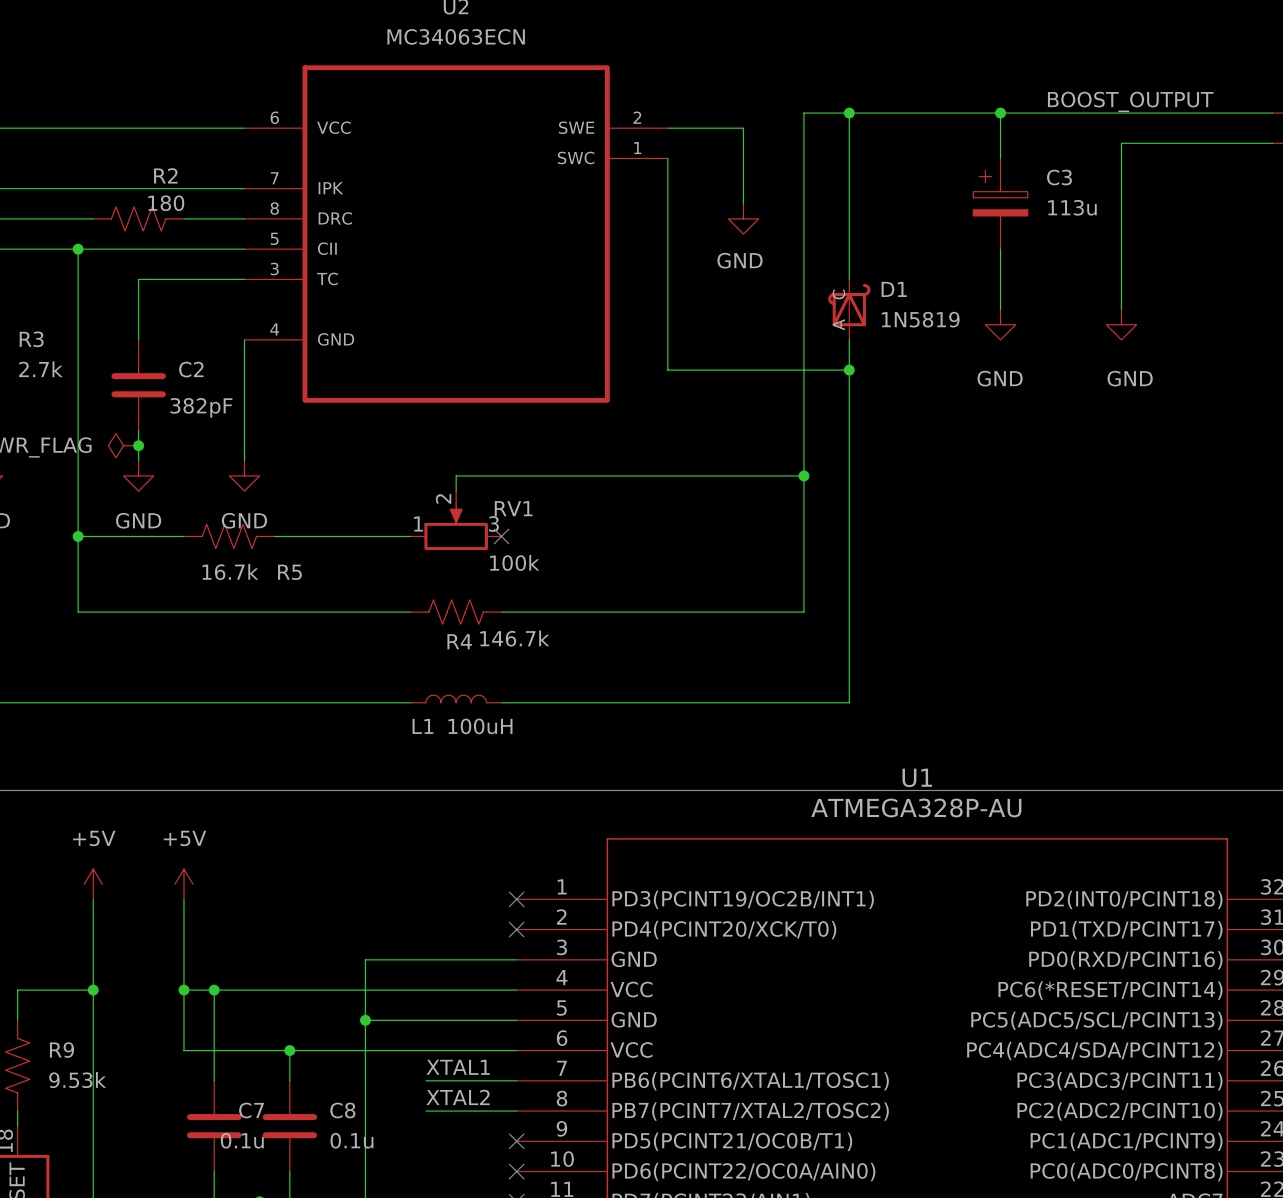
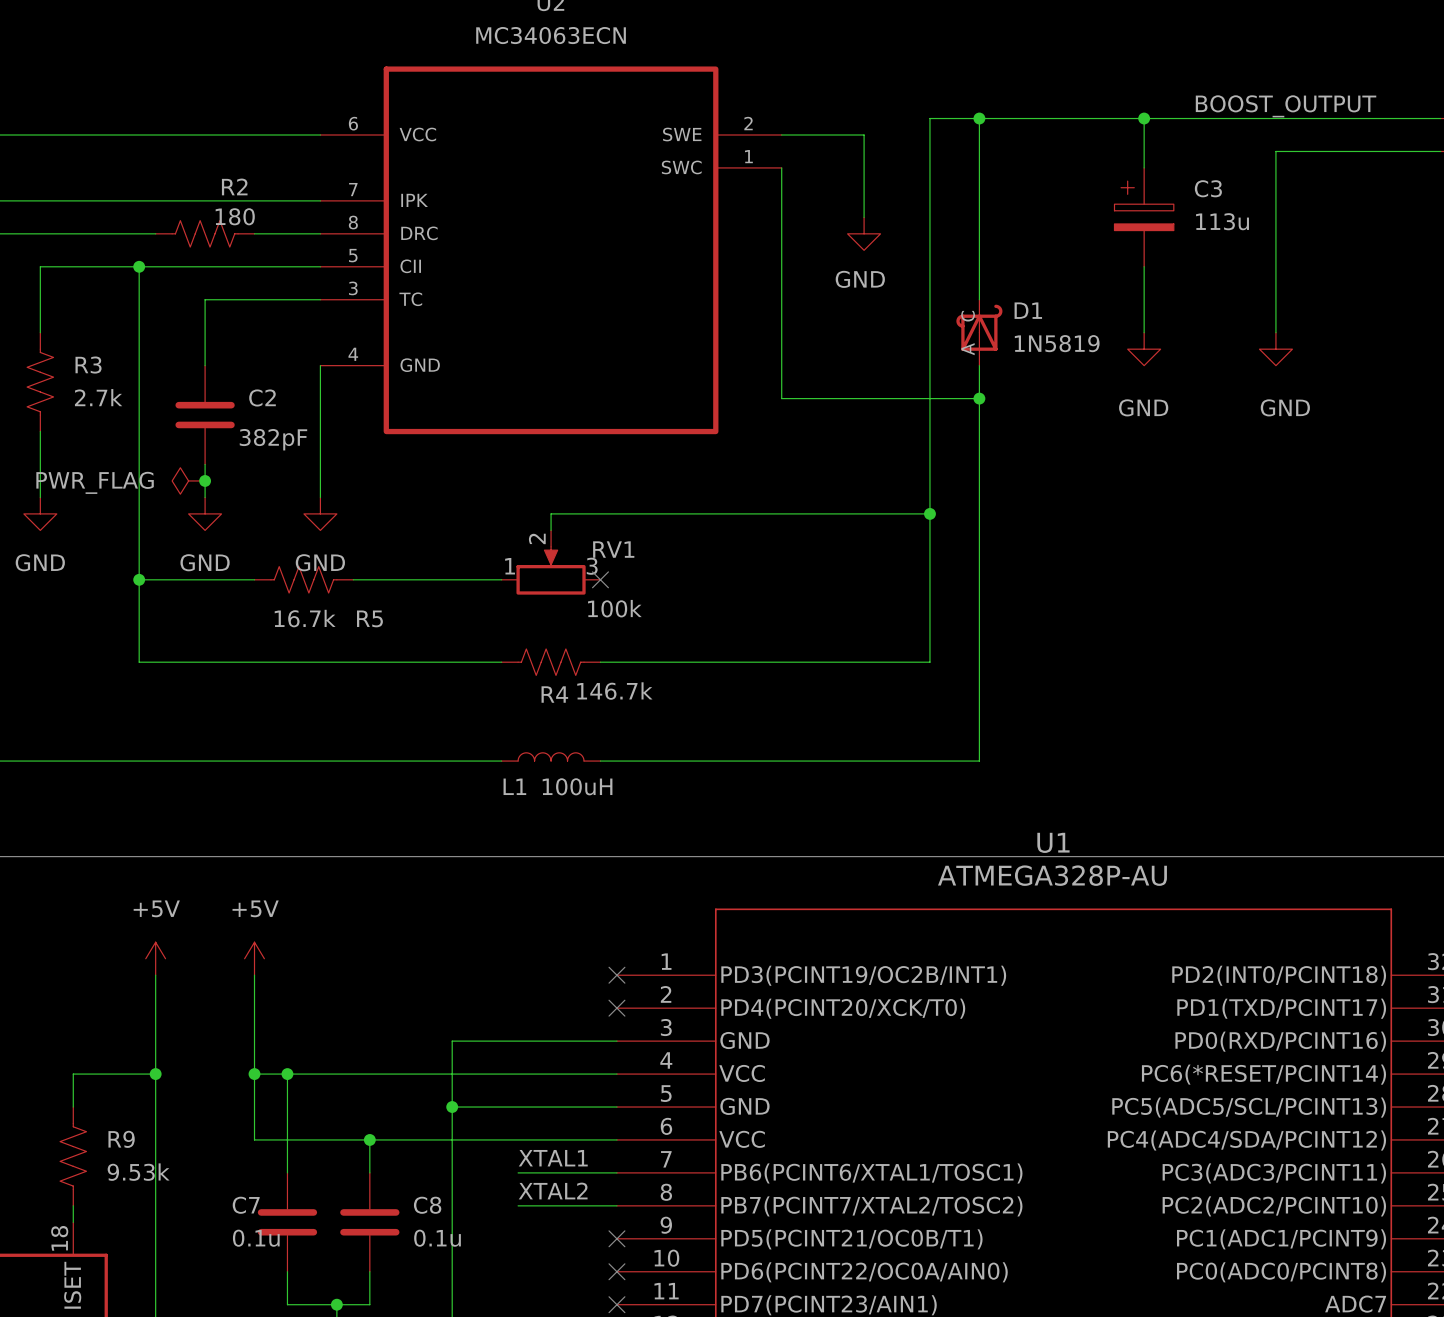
C7 name position: C7 (251, 1110) -> C7 (246, 1205)
C7 value position: 0.1u (242, 1140) -> 0.1u (256, 1238)

